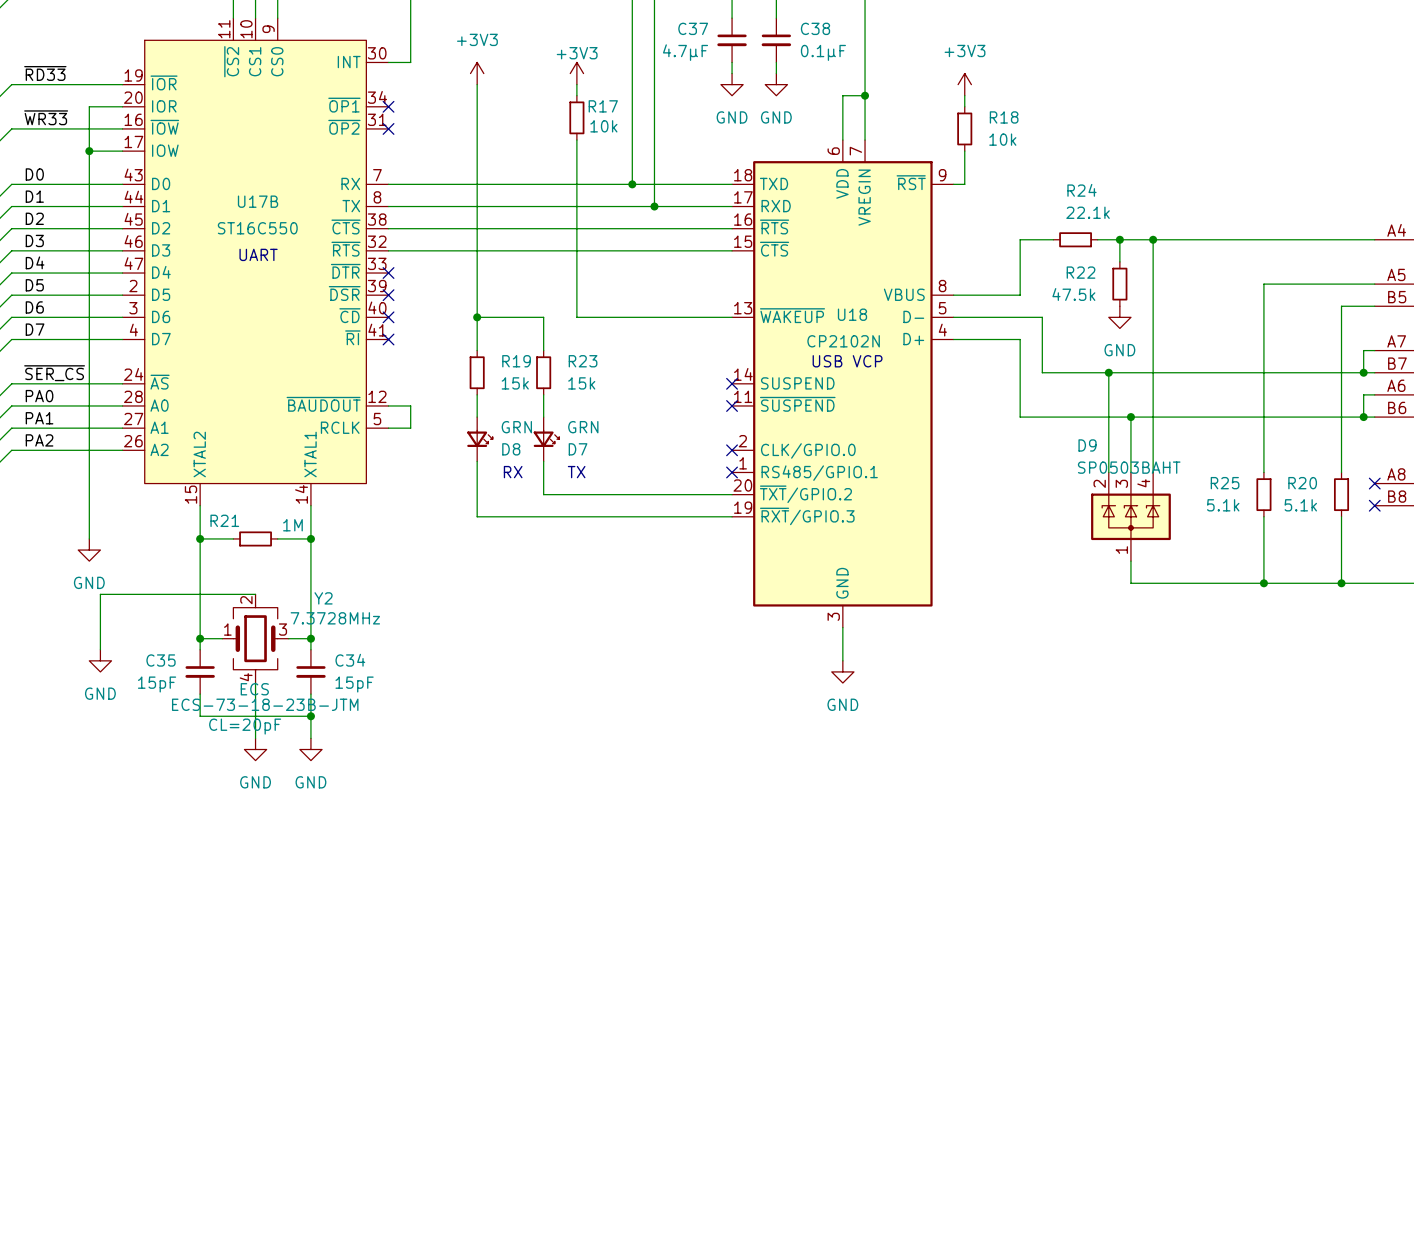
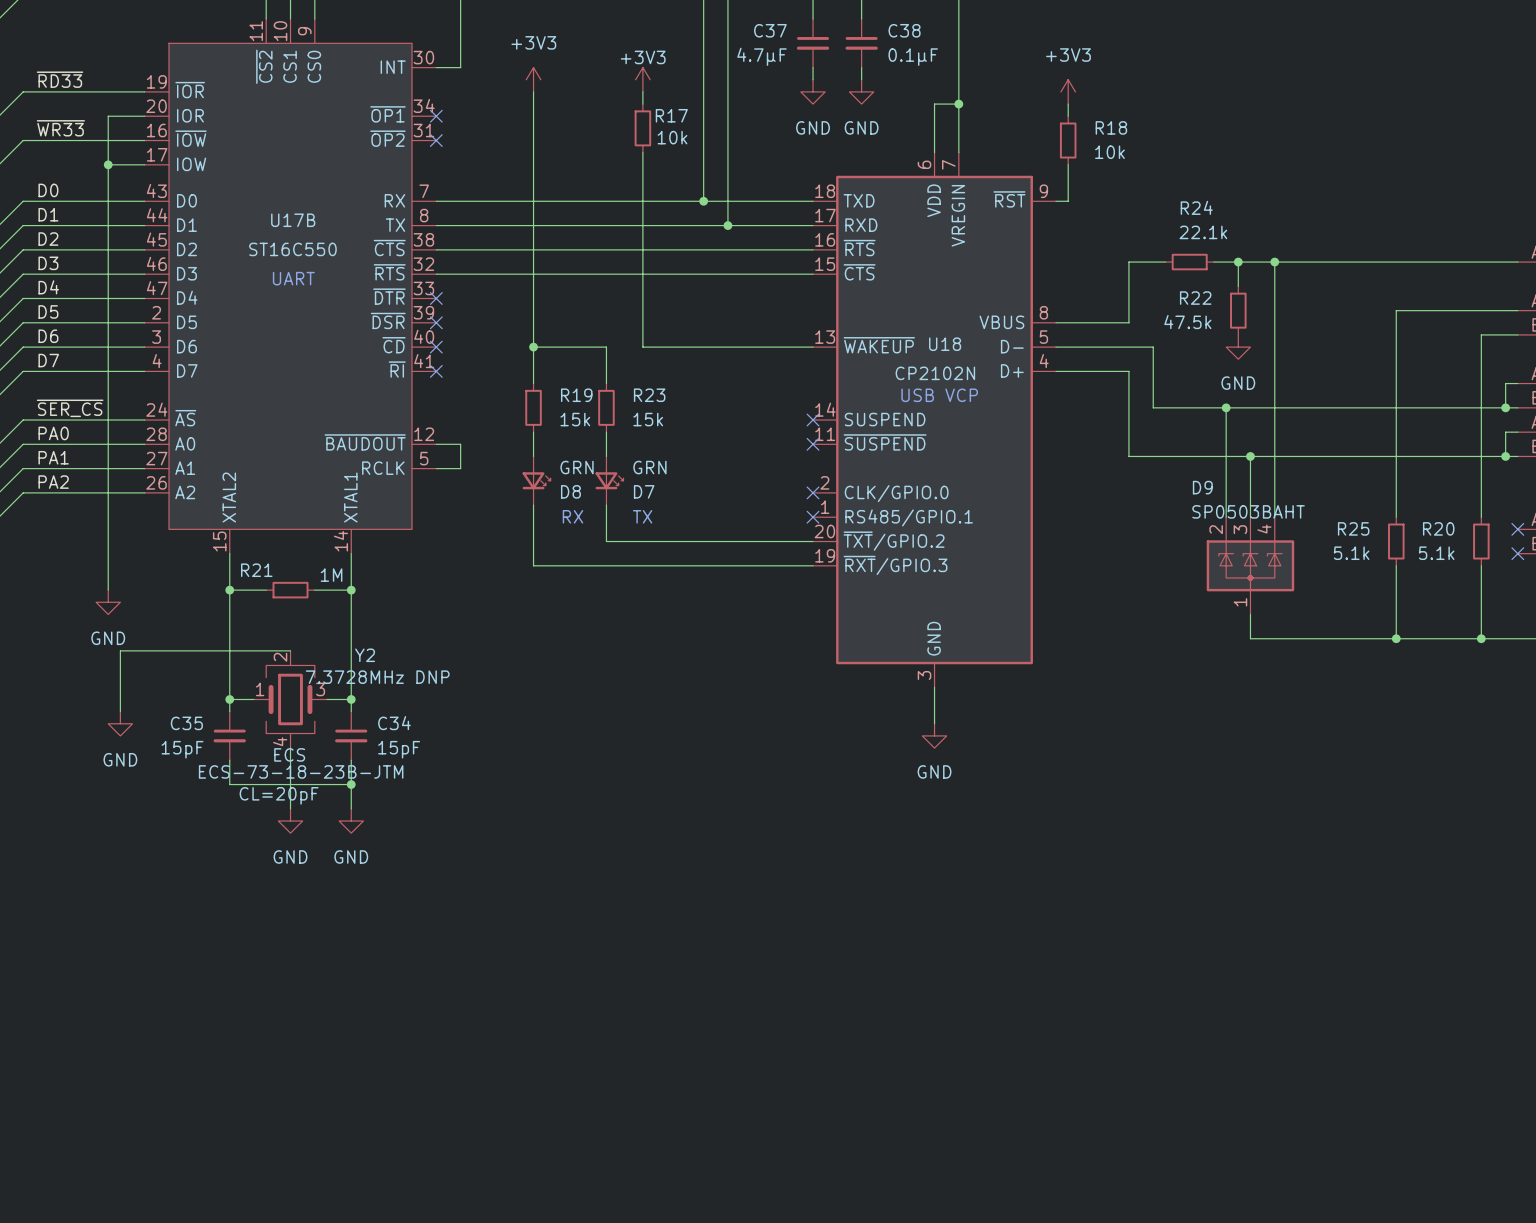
Y2 value: 7.3728MHz (335, 618) -> 7.3728MHz DNP (377, 677)

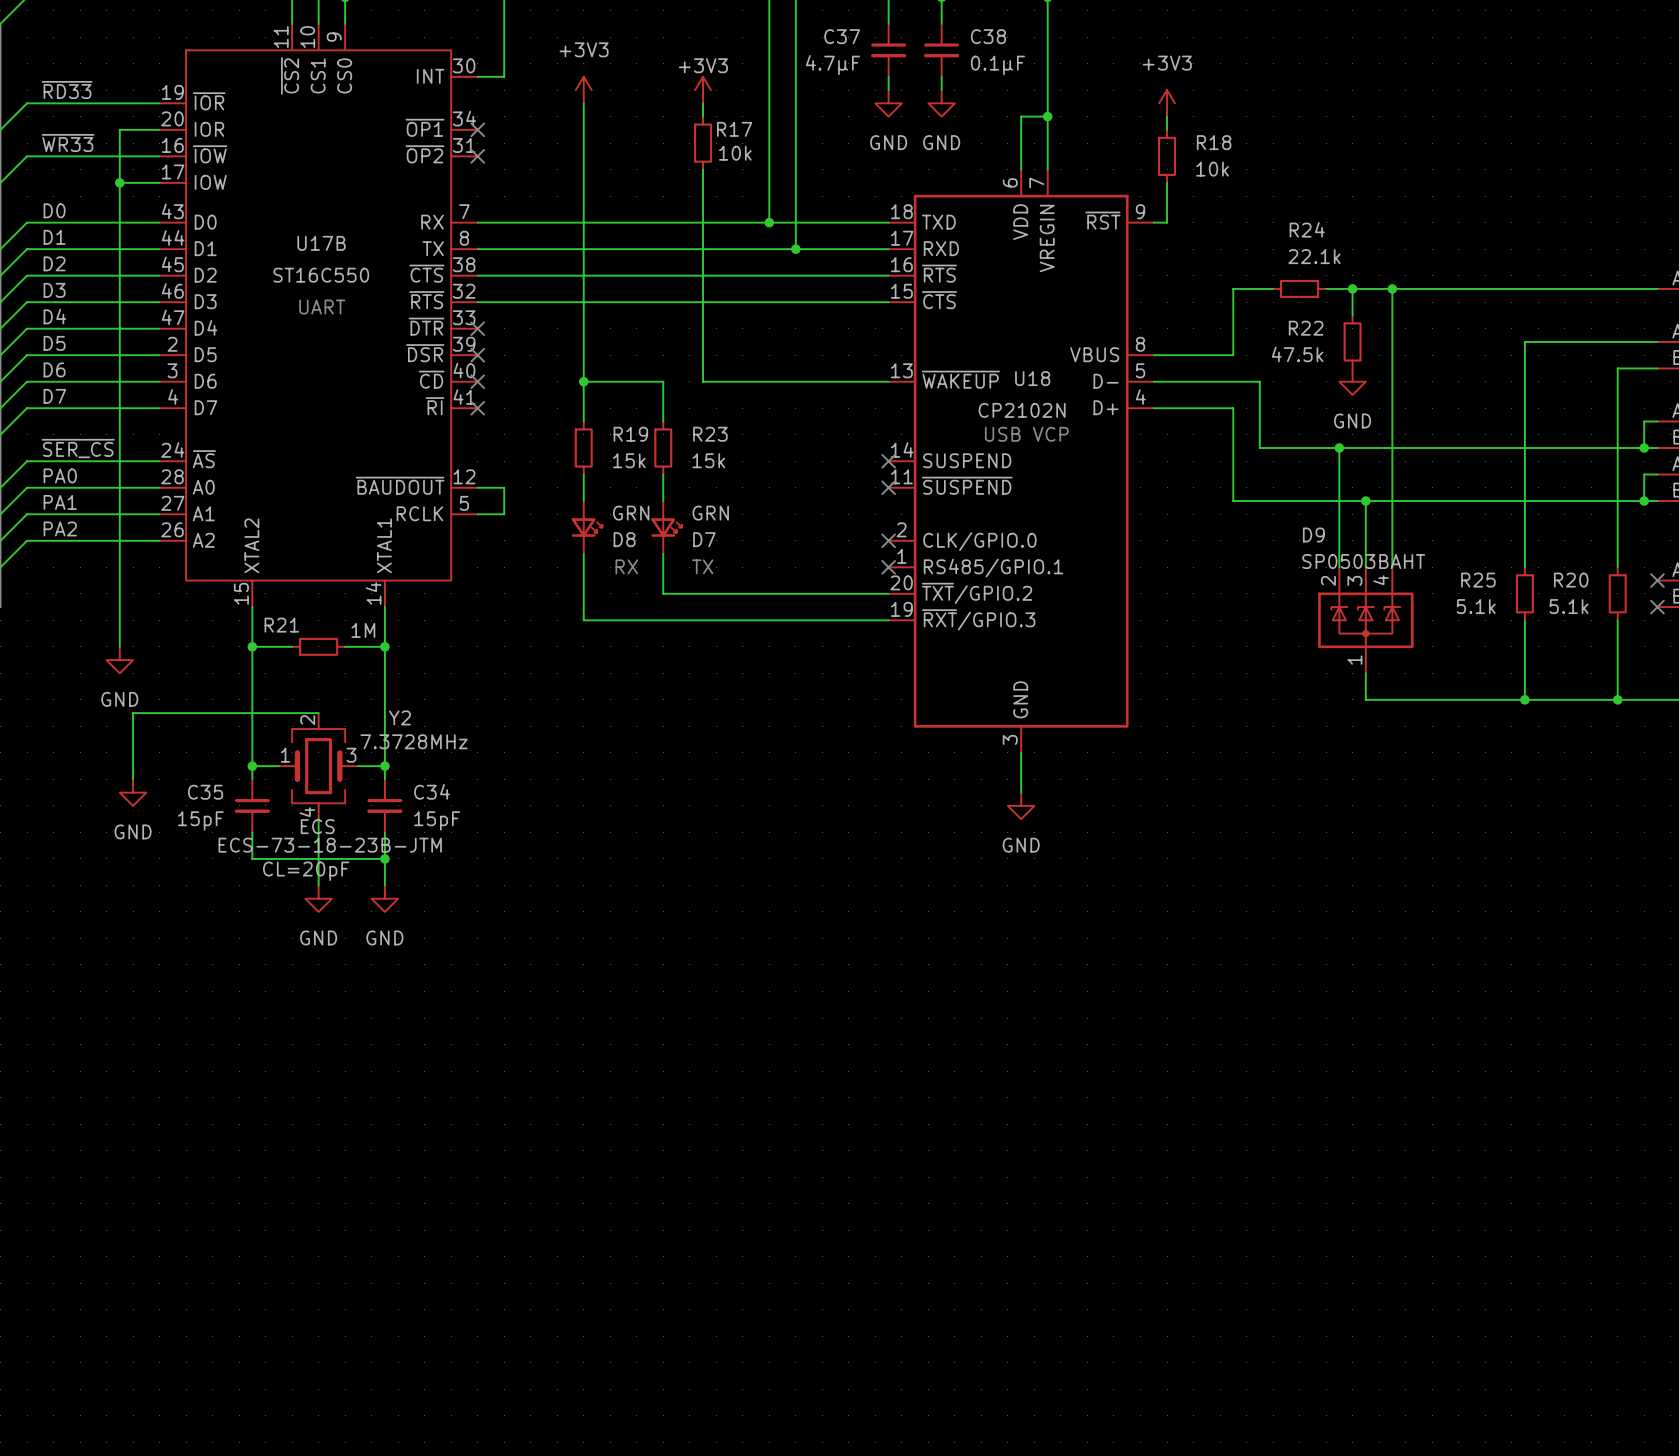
Y2 value: 7.3728MHz DNP (377, 677) -> 7.3728MHz (414, 741)

